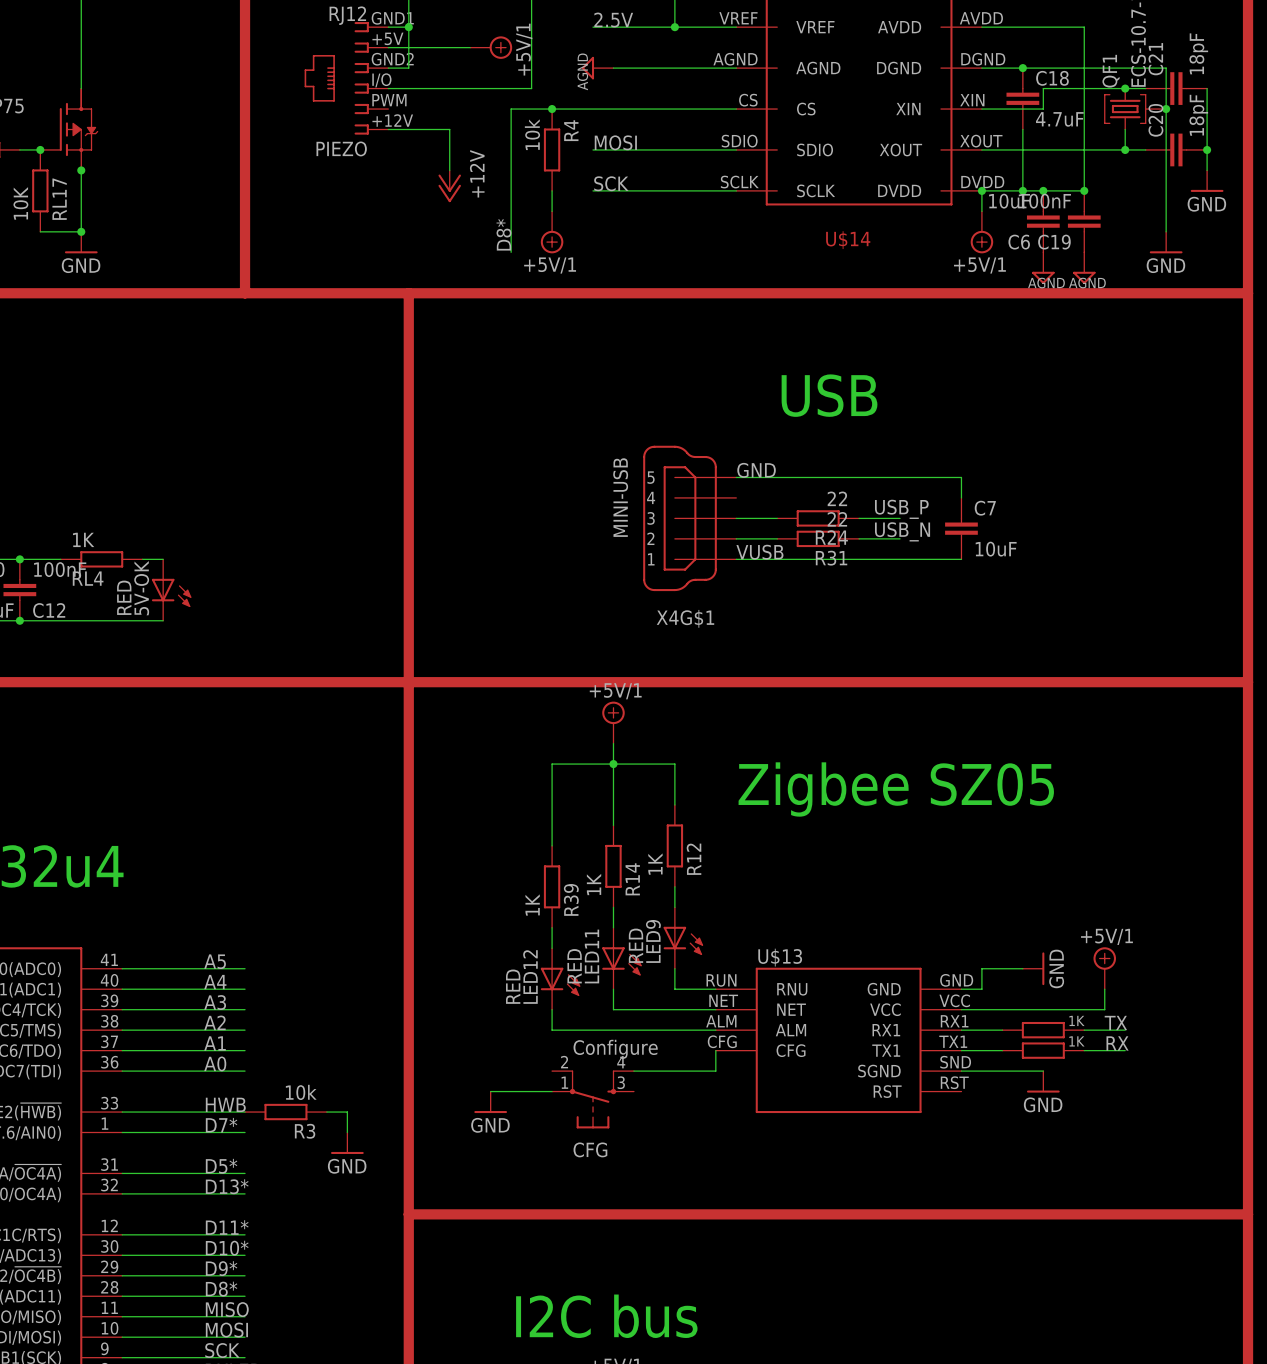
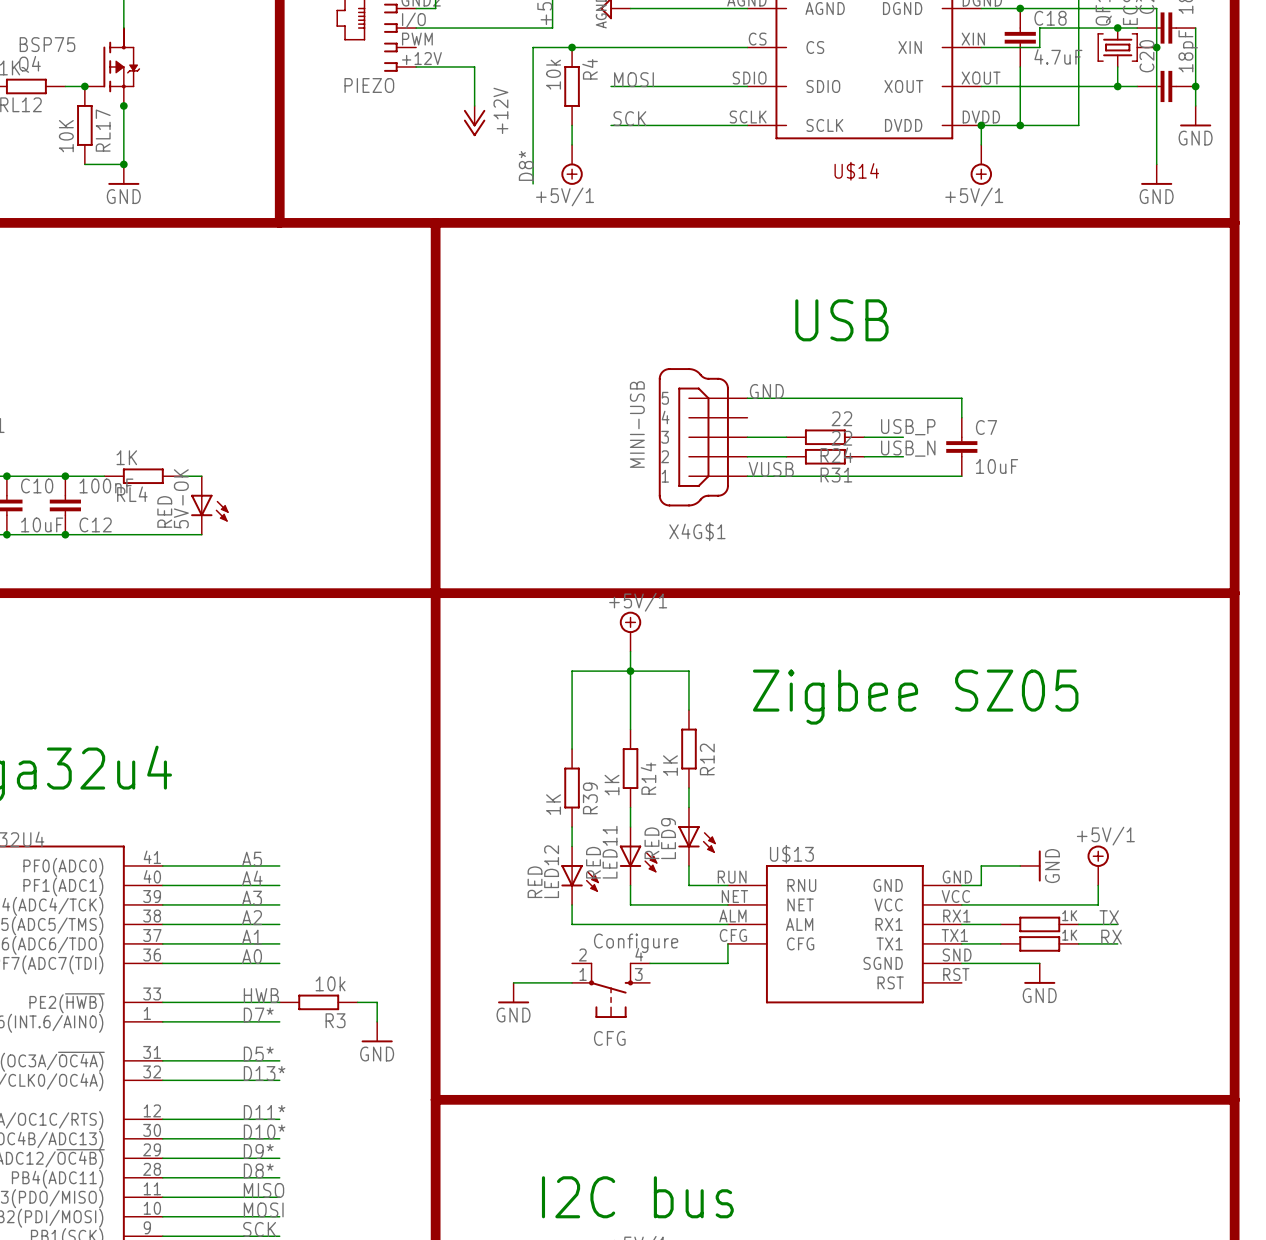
junction: (1043, 190) -> none
junction: (1084, 190) -> none
C6: 10uF (1043, 221) -> none
C19: 100nF (1084, 221) -> none
power symbol: AGND (1043, 268) -> none
power symbol: AGND (1084, 268) -> none

